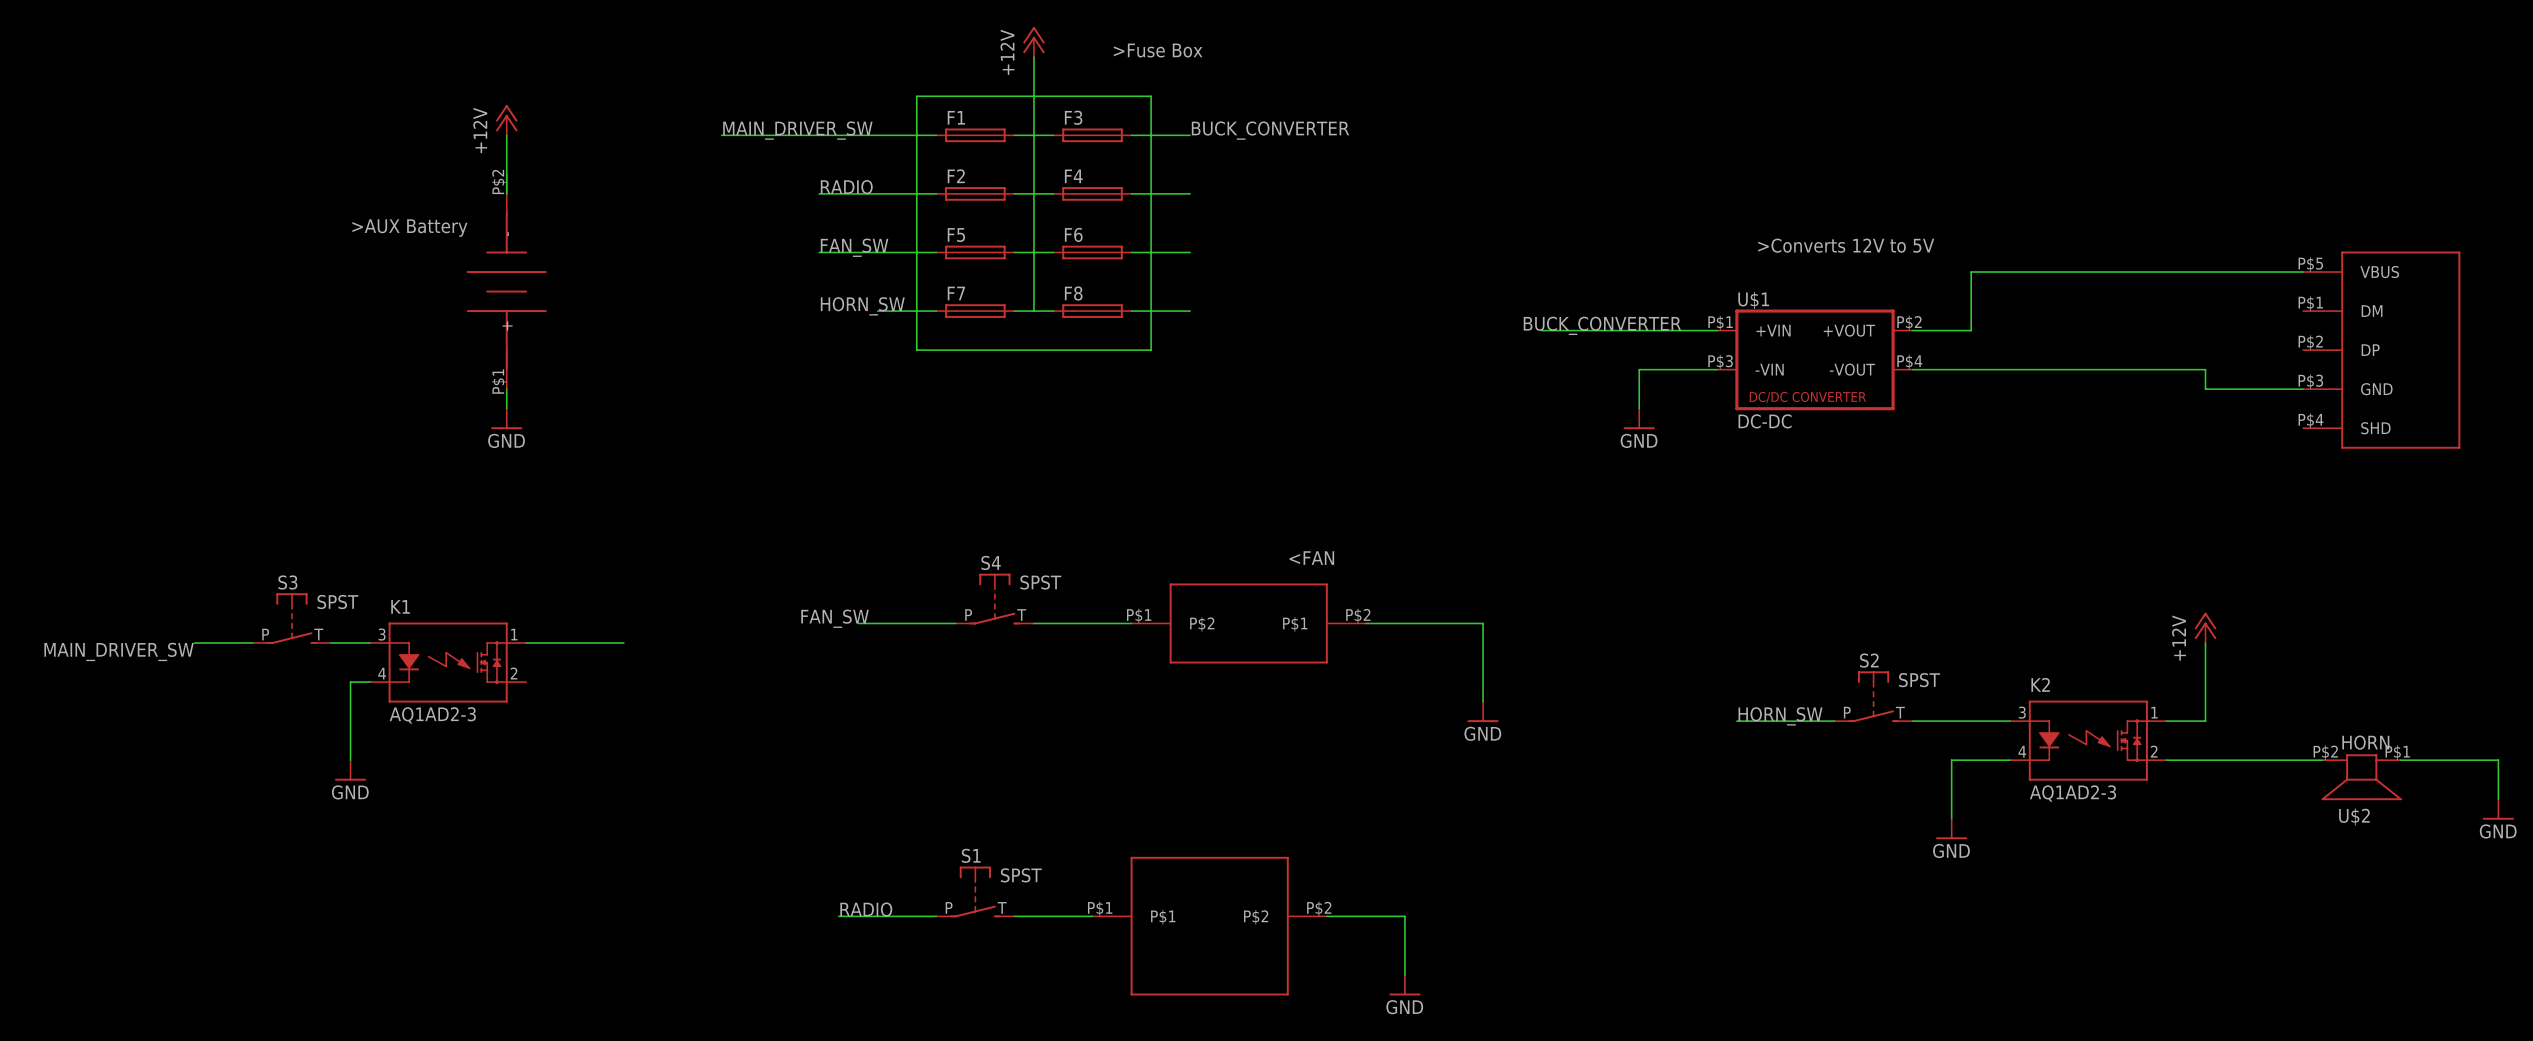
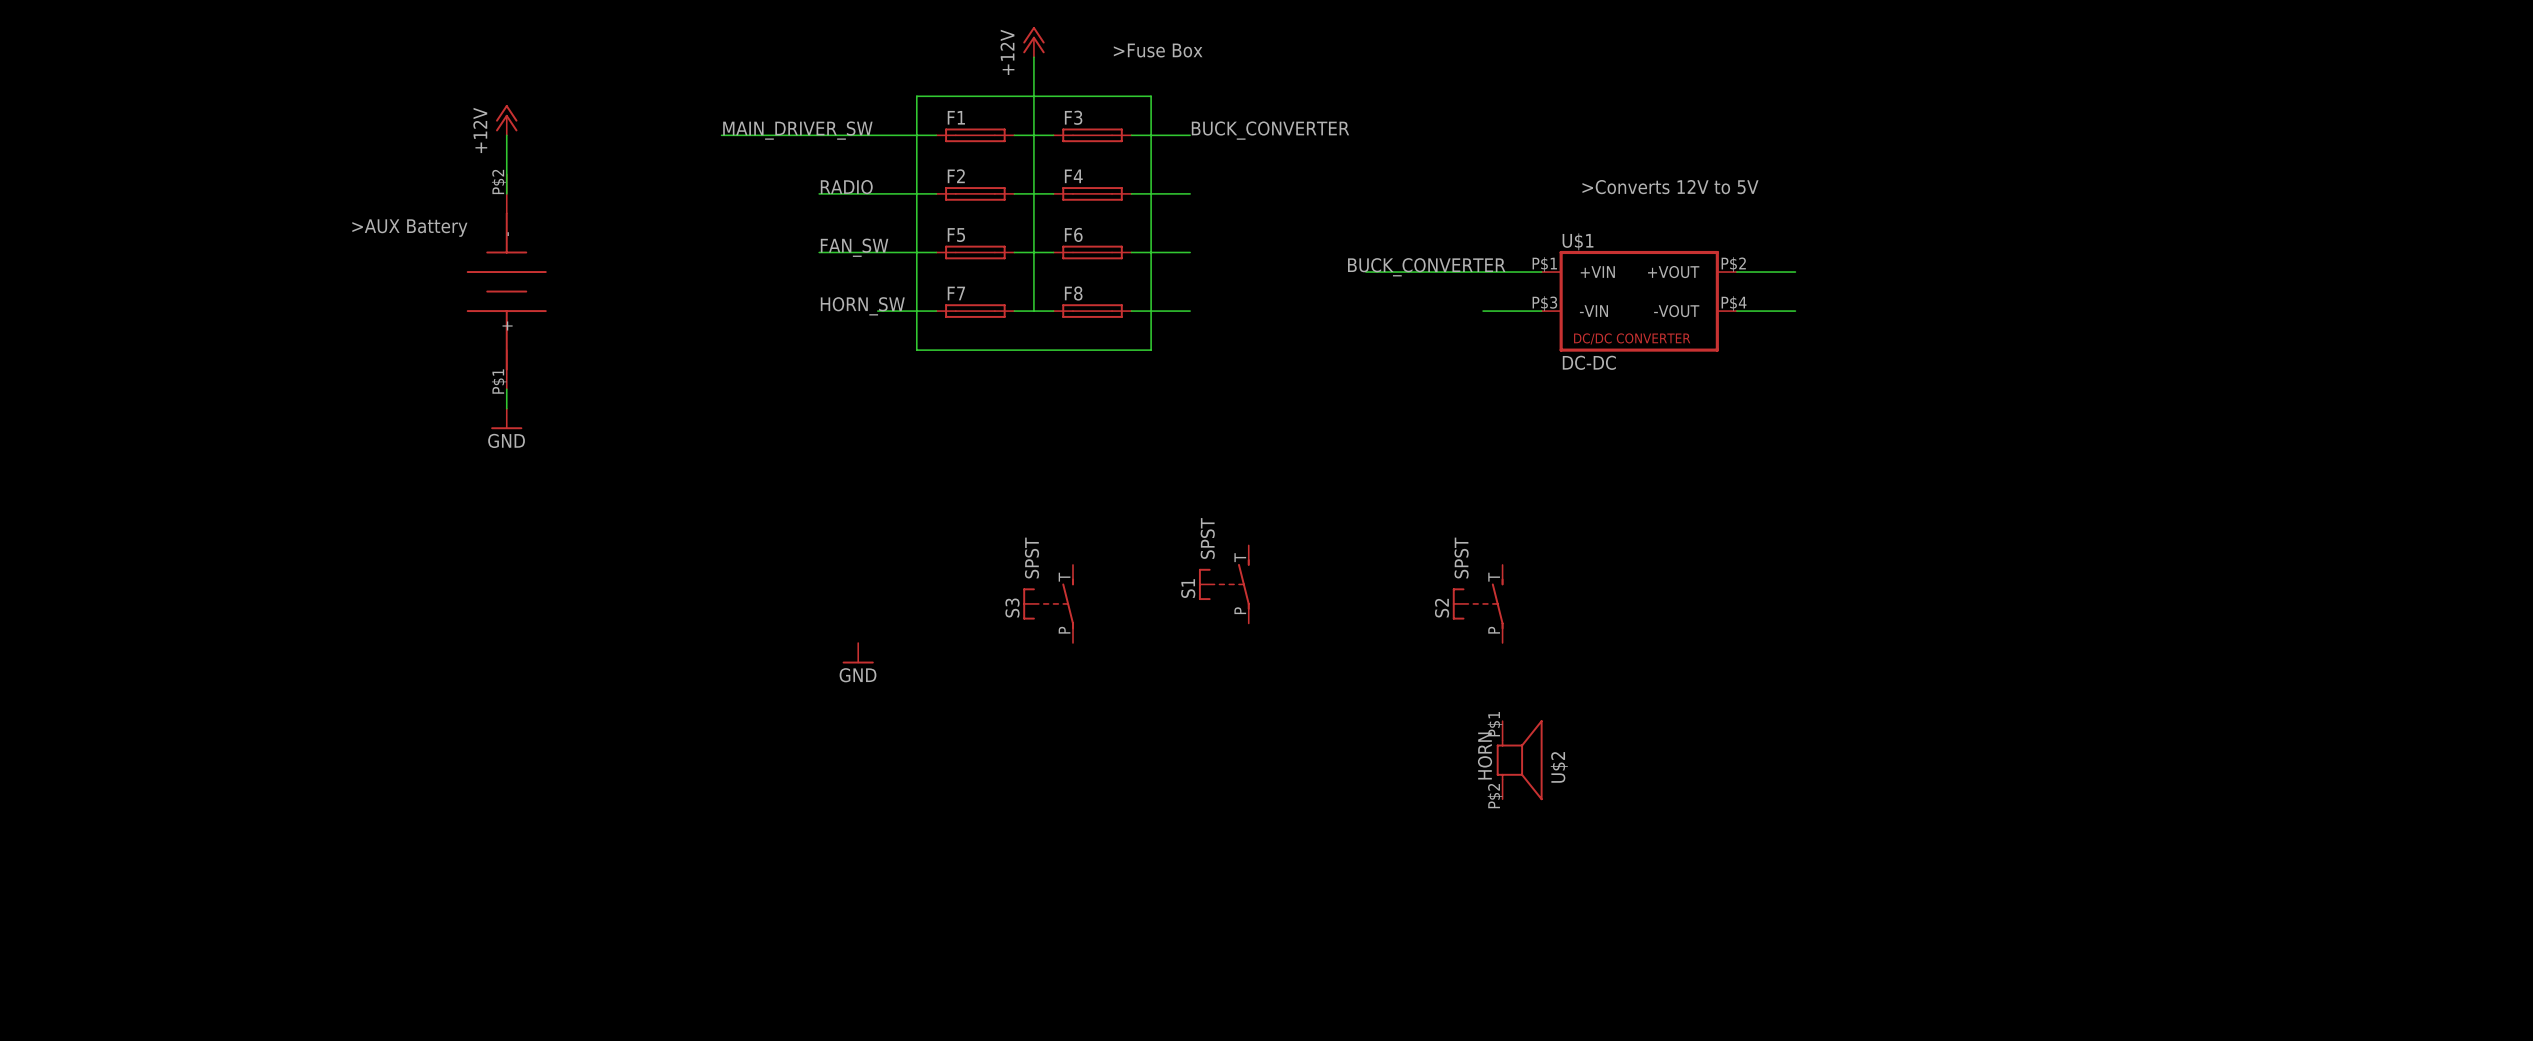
text position: >Converts 12V to 5V (1846, 245) -> >Converts 12V to 5V (1670, 187)
wire: none -> (1736, 272) (1795, 272)
wire: (2303, 272) (1971, 272) (1971, 330) (1912, 330) -> none
wire: none -> (1483, 311) (1541, 311)
label position: BUCK_CONVERTER (1602, 325) -> BUCK_CONVERTER (1426, 267)
wire: (1541, 330) (1717, 330) -> (1365, 272) (1541, 272)
part: (2381, 350) -> none
U$1 position: (1814, 359) -> (1639, 301)
wire: (1717, 369) (1639, 369) (1639, 408) -> none
wire: (1912, 369) (2205, 369) (2205, 389) (2303, 389) -> none
power symbol: GND (1639, 418) -> none
S4: SPST (994, 599) -> none
S3 rotation: 0° (291, 618) -> 90° counterclockwise (1048, 603)
S3 position: (291, 618) -> (1048, 603)
label: FAN_SW (835, 618) -> none
wire: (858, 623) (955, 623) -> none
wire: (1033, 623) (1131, 623) -> none
part: (1248, 623) -> none
wire: (1365, 623) (1483, 623) (1483, 701) -> none
power symbol: +12V (2205, 627) -> none
wire: (194, 643) (252, 643) -> none
wire: (331, 643) (370, 643) -> none
wire: (526, 643) (623, 643) -> none
wire: (2205, 643) (2205, 721) (2166, 721) -> none
label: MAIN_DRIVER_SW (119, 651) -> none
power symbol: none -> GND (858, 653)
K1: AQ1AD2-3 (448, 662) -> none
wire: (370, 682) (350, 682) (350, 760) -> none
S2 rotation: 0° (1873, 696) -> 90° counterclockwise (1478, 603)
S2 position: (1873, 696) -> (1478, 603)
power symbol: GND (1483, 711) -> none
label: HORN_SW (1780, 716) -> none
wire: (1736, 721) (1834, 721) -> none
wire: (1912, 721) (2010, 721) -> none
K2: AQ1AD2-3 (2088, 740) -> none
wire: (2010, 760) (1951, 760) (1951, 818) -> none
wire: (2166, 760) (2322, 760) -> none
wire: (2400, 760) (2498, 760) (2498, 799) -> none
power symbol: GND (350, 770) -> none
U$2 rotation: 0° (2361, 777) -> 90° counterclockwise (1519, 760)
U$2 position: (2361, 777) -> (1519, 760)
power symbol: GND (2498, 809) -> none
power symbol: GND (1951, 828) -> none
S1 rotation: 0° (975, 891) -> 90° counterclockwise (1224, 584)
S1 position: (975, 891) -> (1224, 584)
label: RADIO (866, 909) -> none
wire: (838, 916) (936, 916) -> none
wire: (1014, 916) (1092, 916) -> none
wire: (1326, 916) (1404, 916) (1404, 974) -> none
part: (1209, 926) -> none
power symbol: GND (1404, 985) -> none

